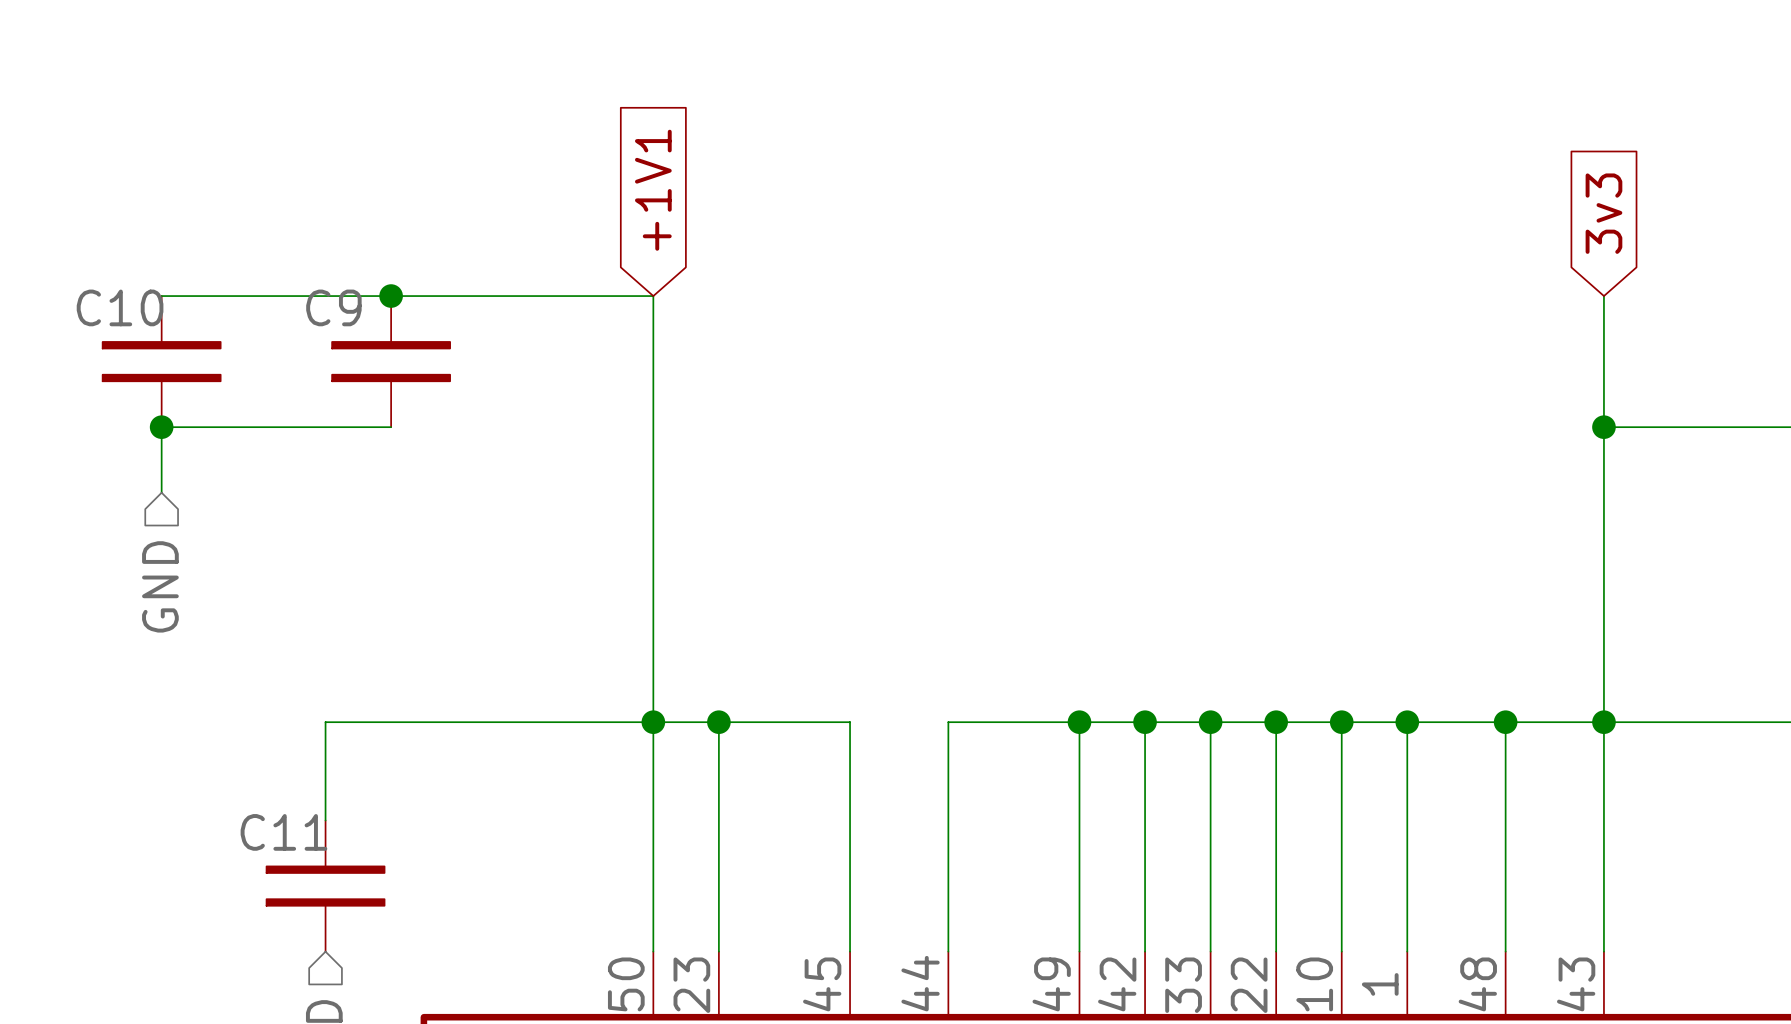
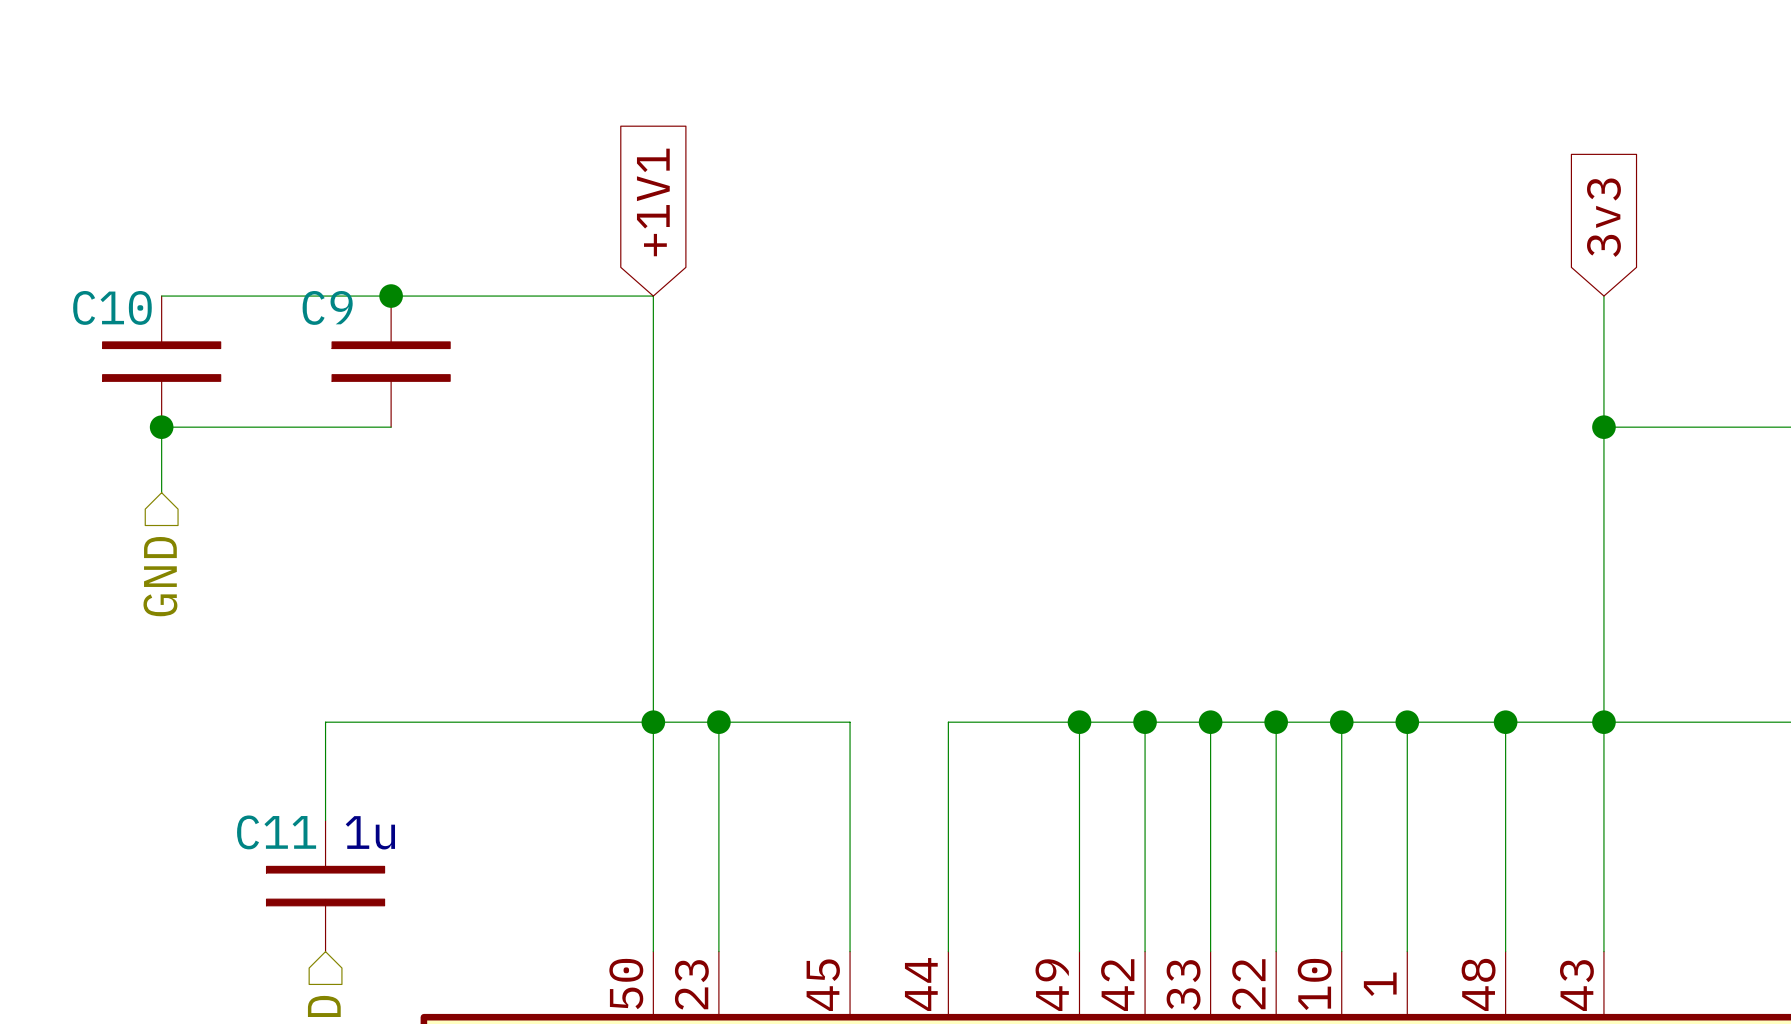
text: none -> 1u (370, 832)

